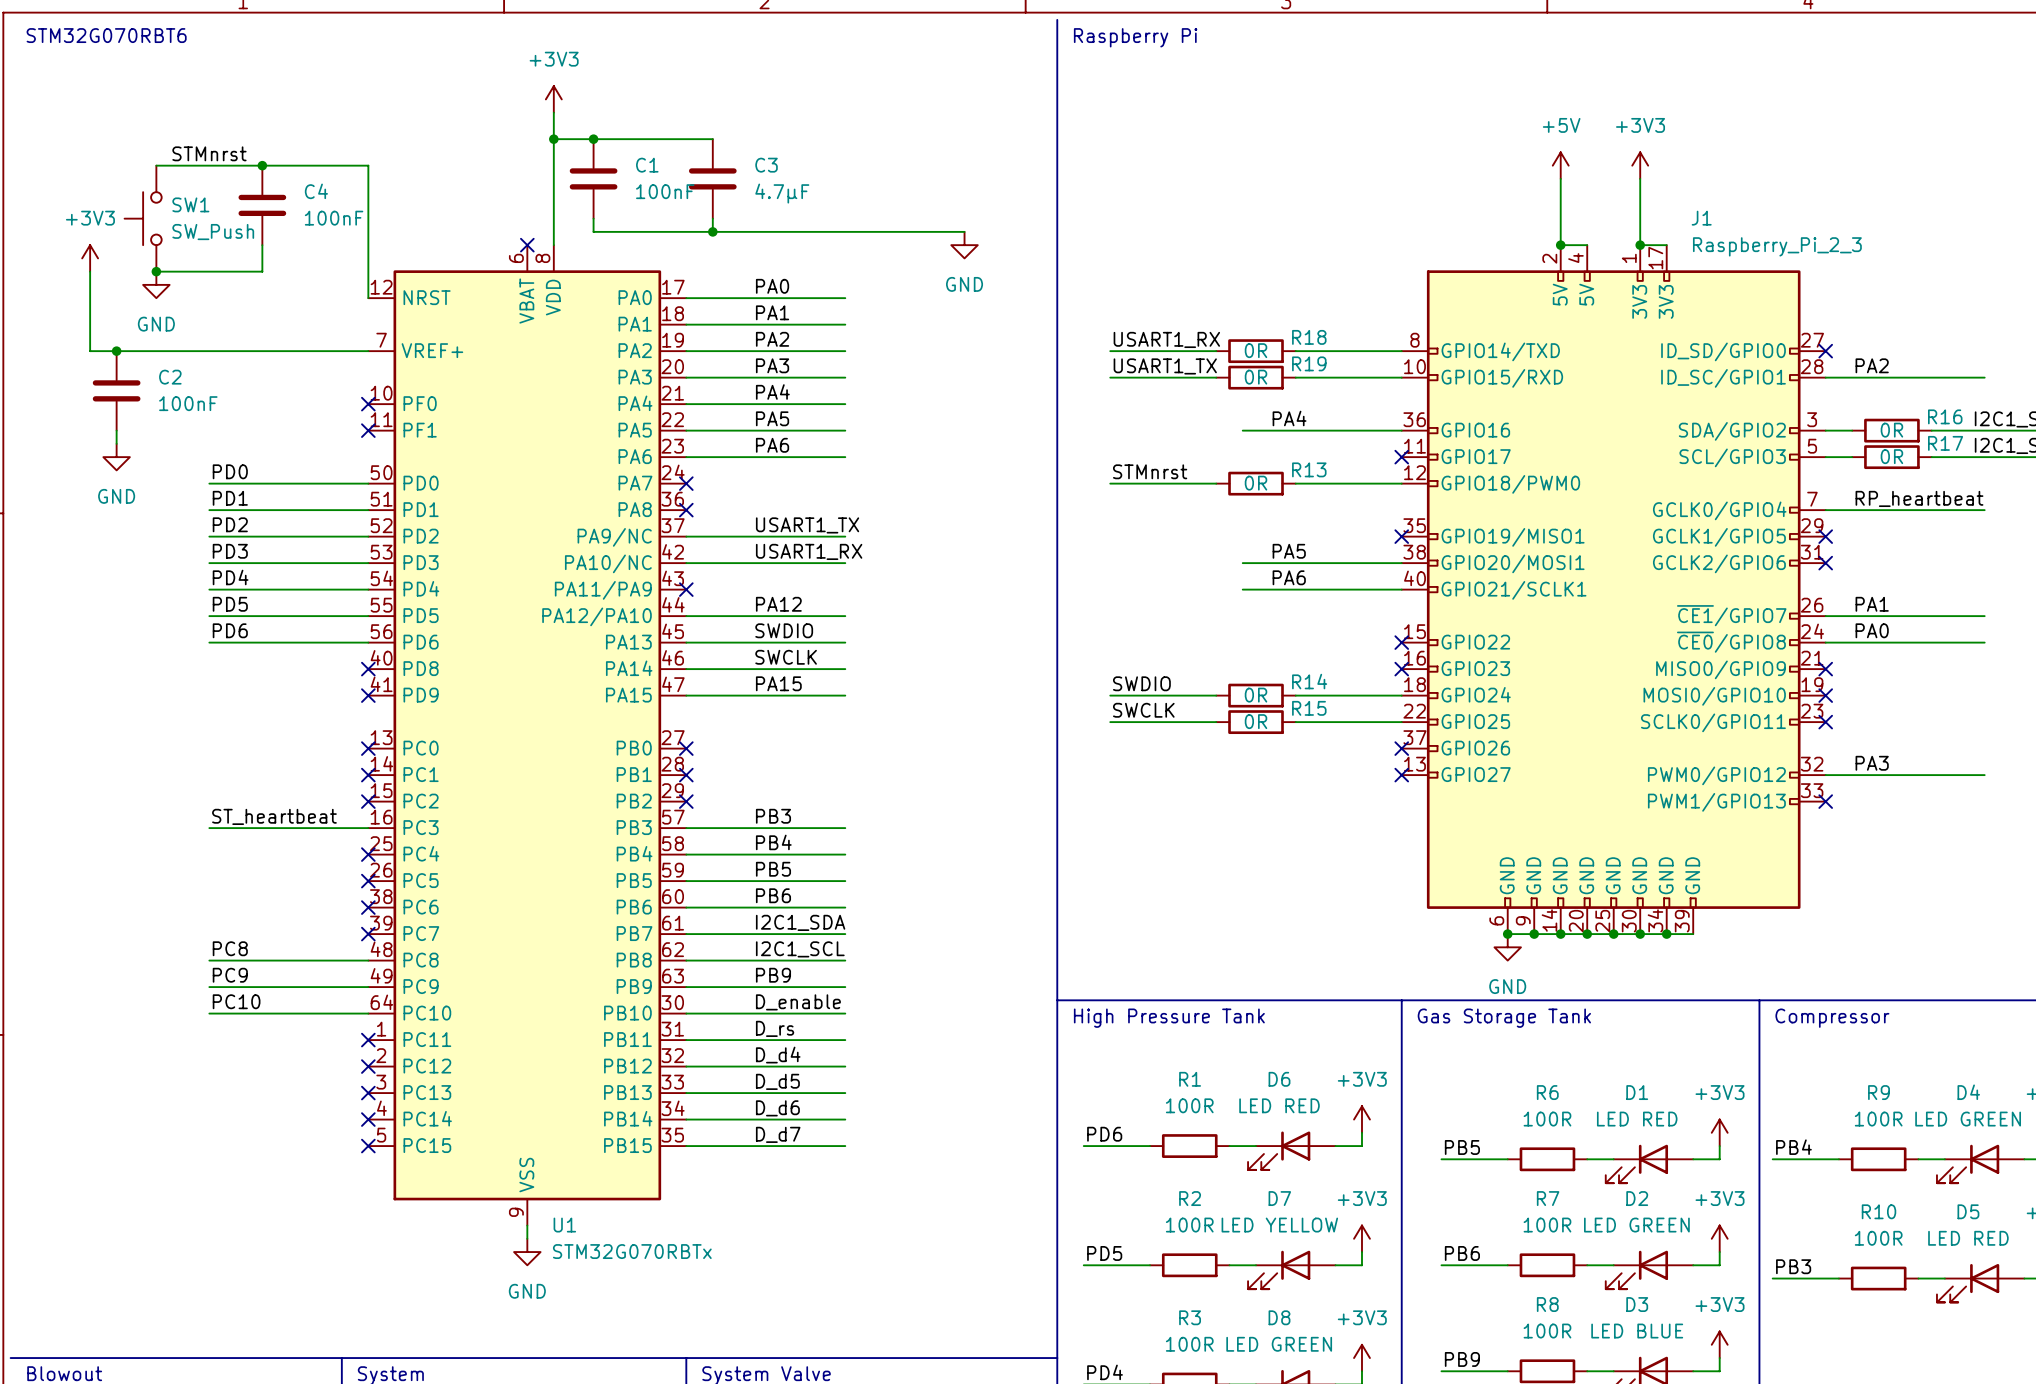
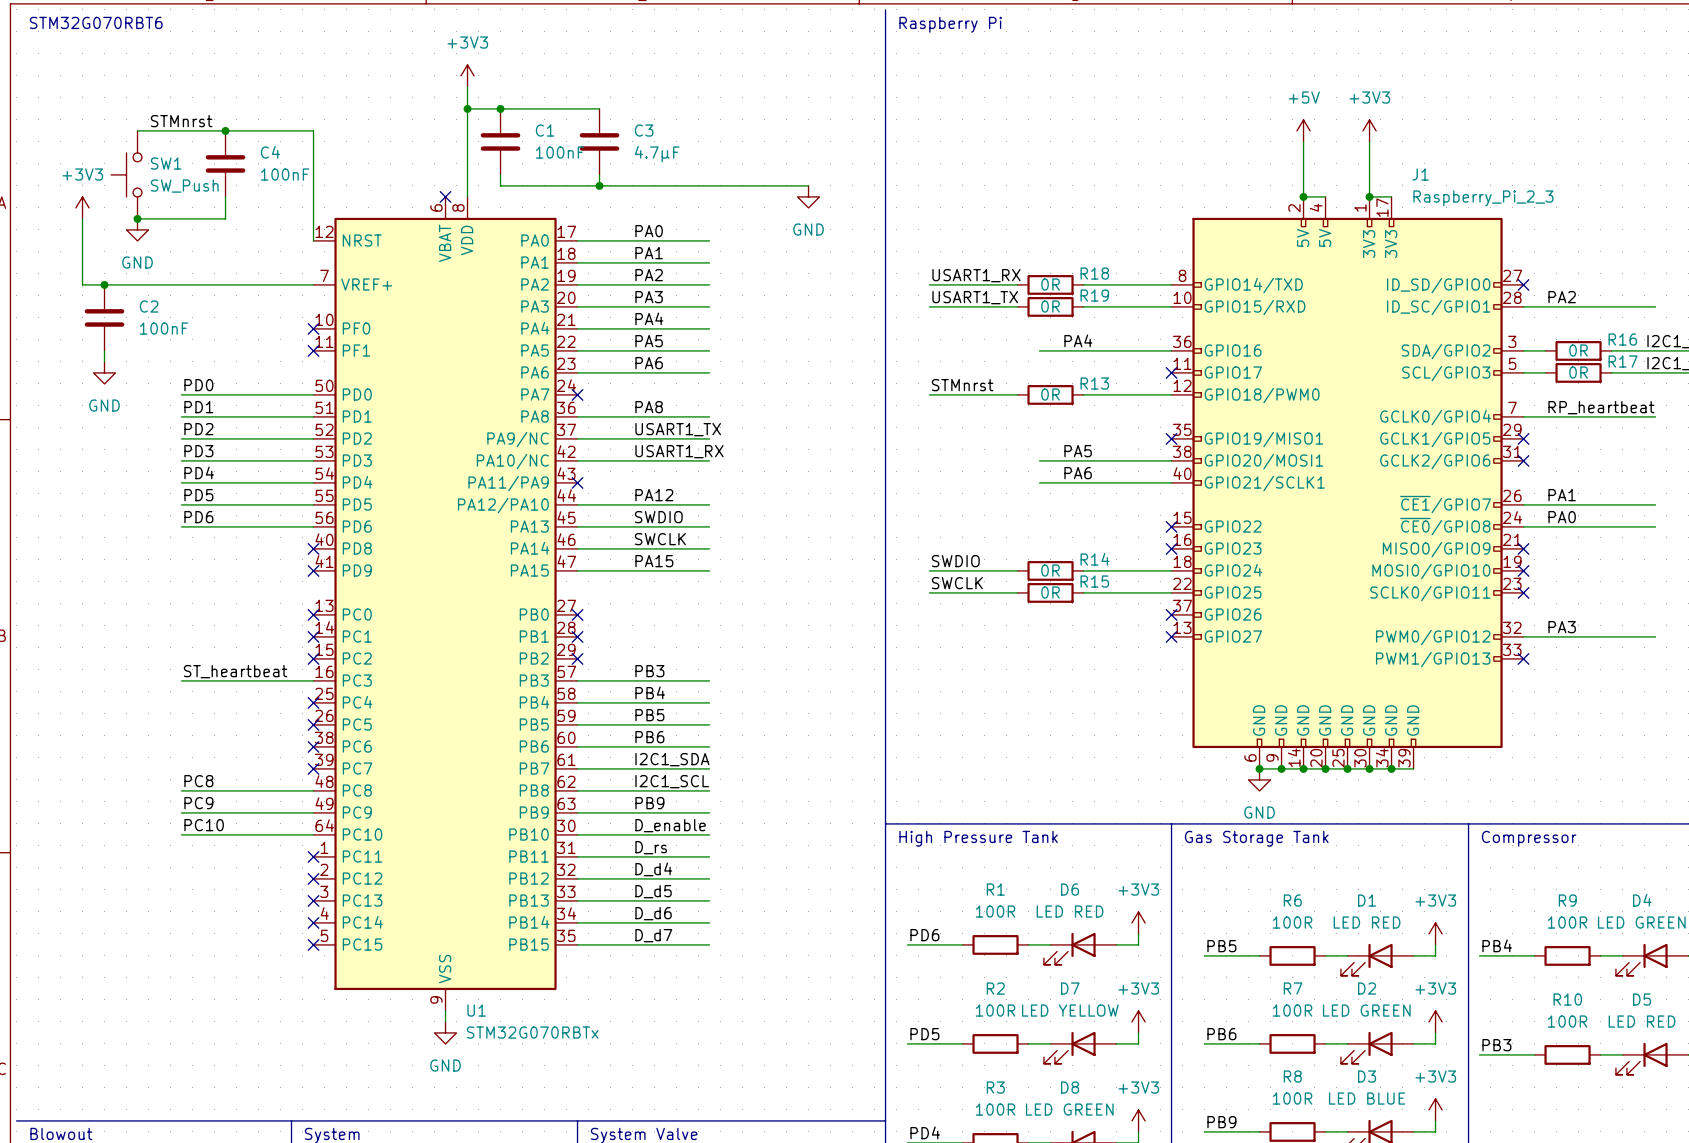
label: none -> PA8 (649, 407)
wire: none -> (577, 416) (709, 416)
no-connect mark: (686, 510) -> none

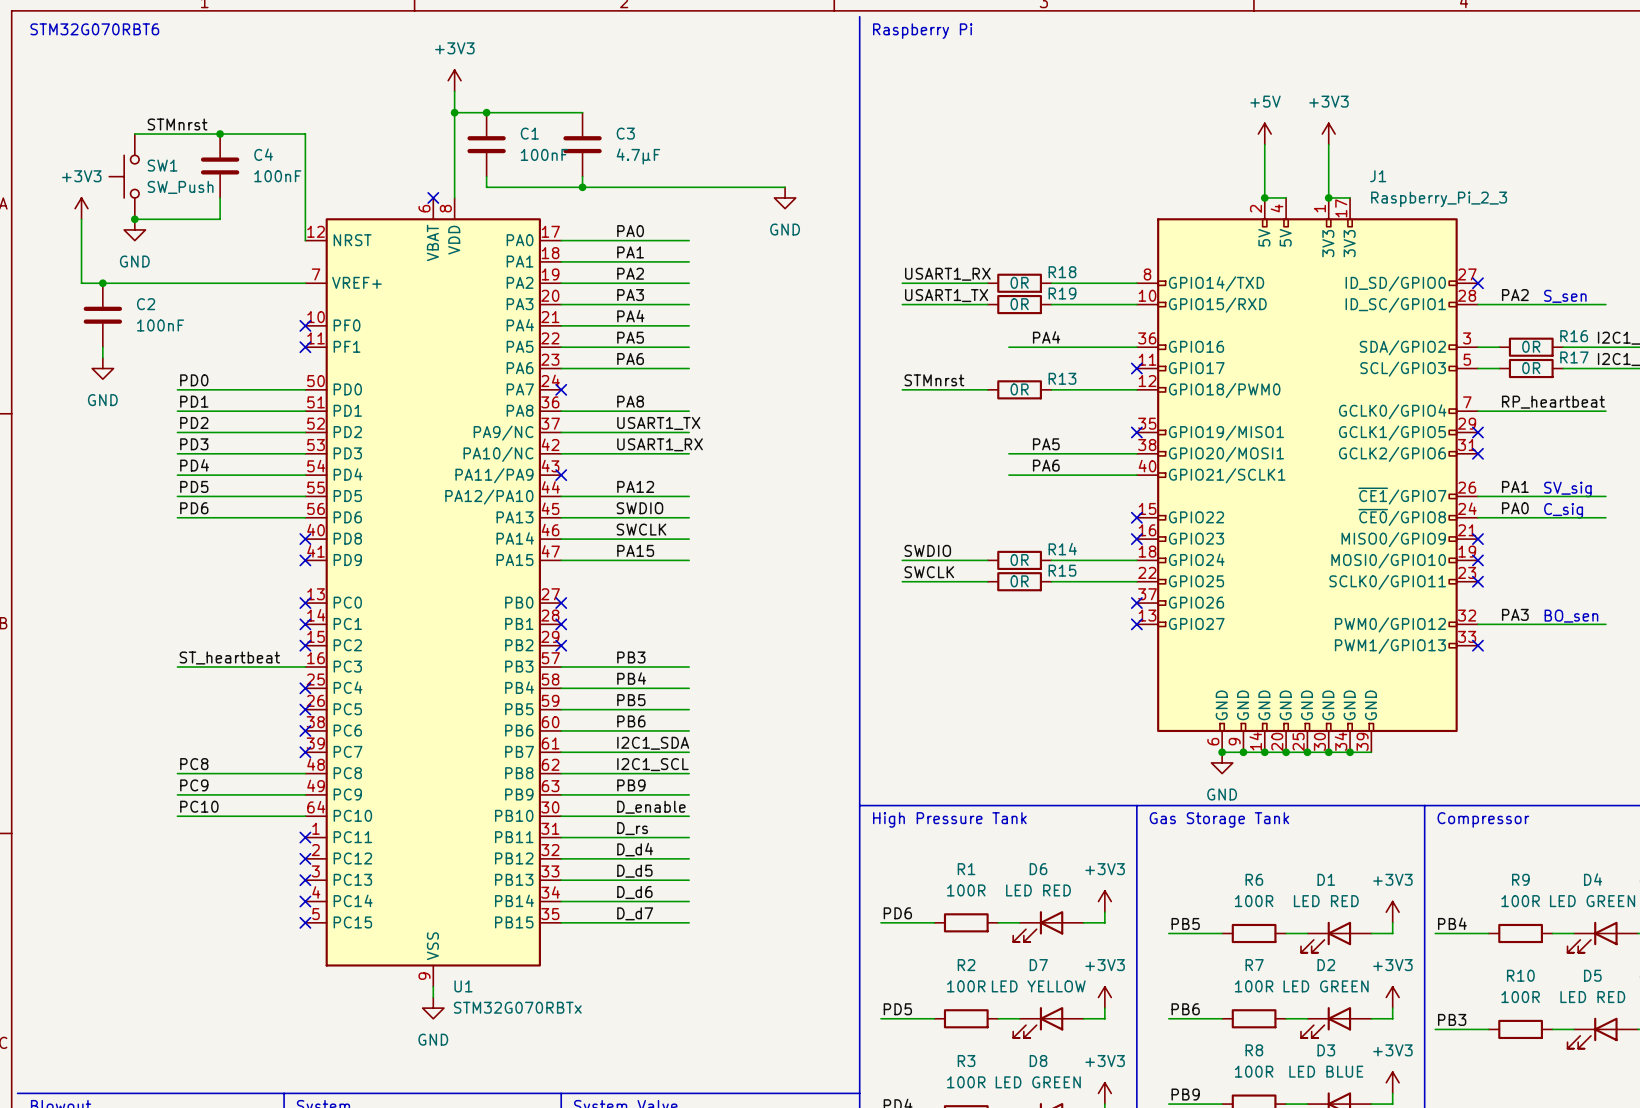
text: none -> S_sen (1565, 296)
text: none -> SV_sig (1567, 489)
text: none -> C_sig (1563, 510)
text: none -> BO_sen (1571, 616)

